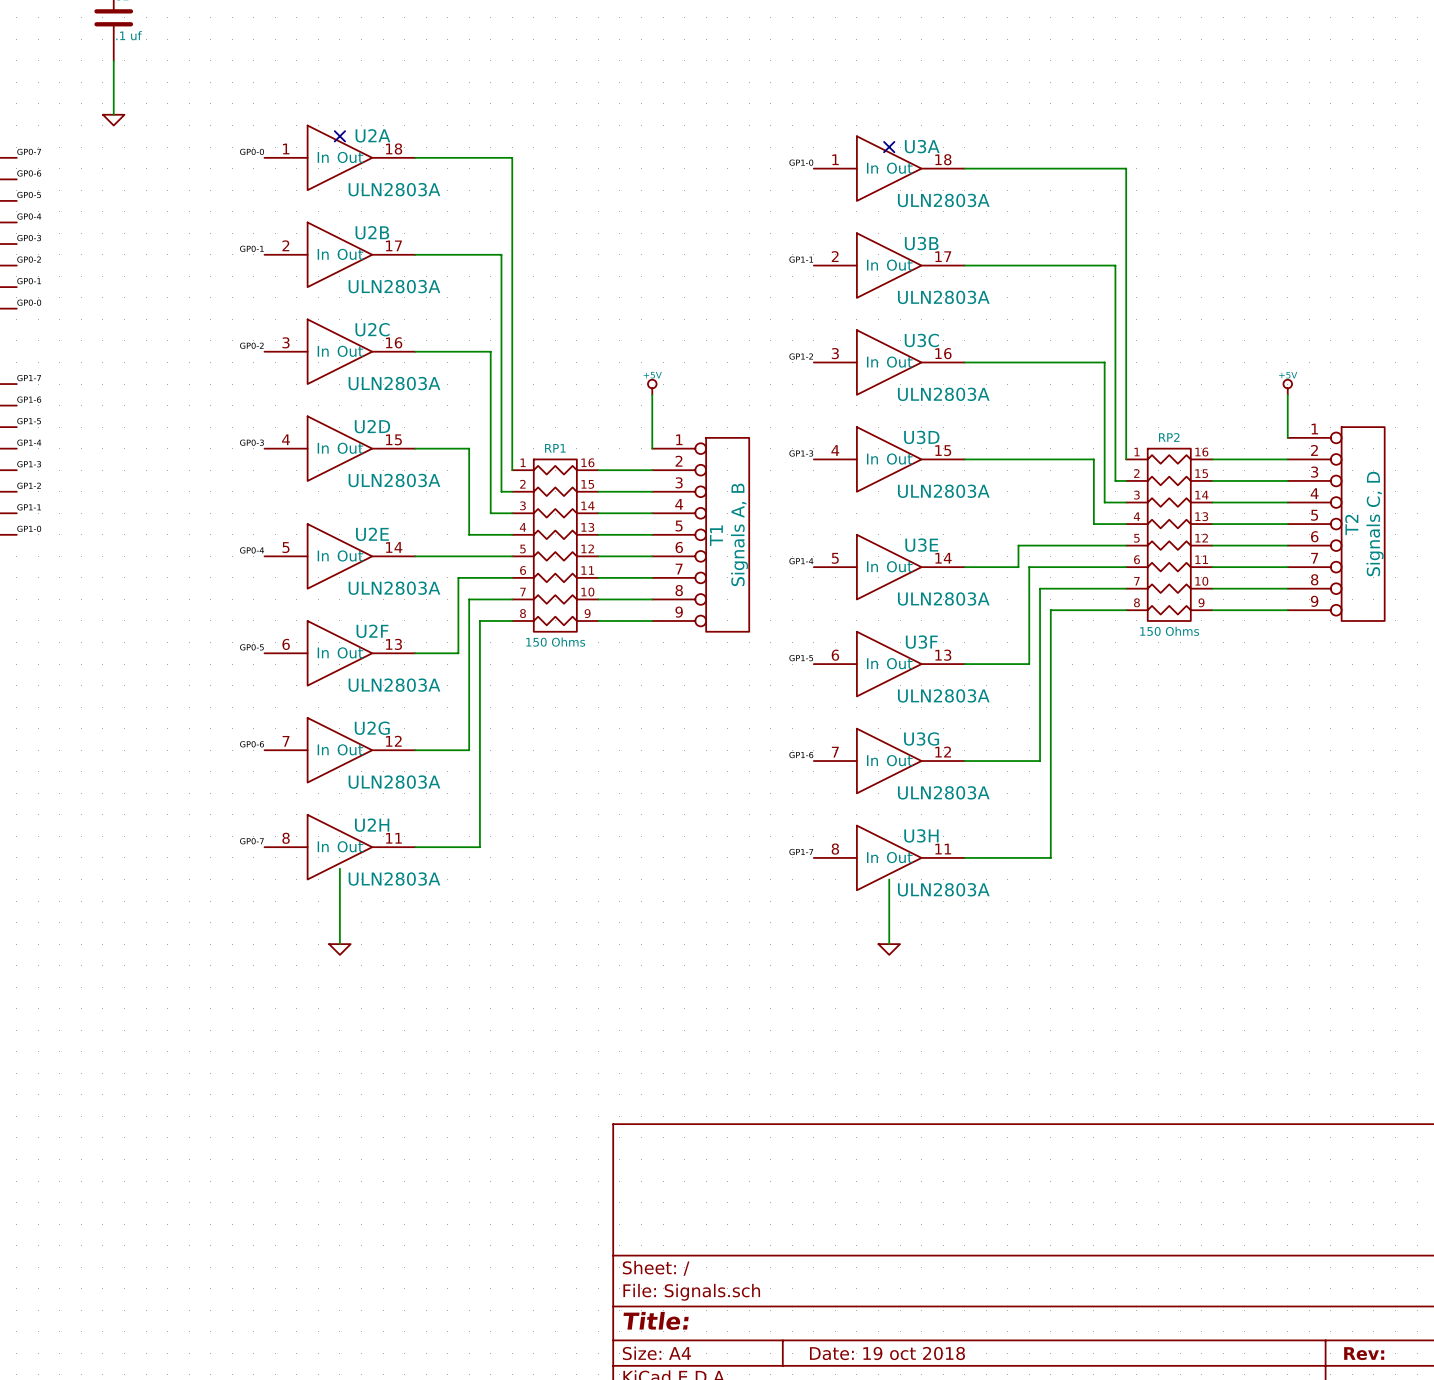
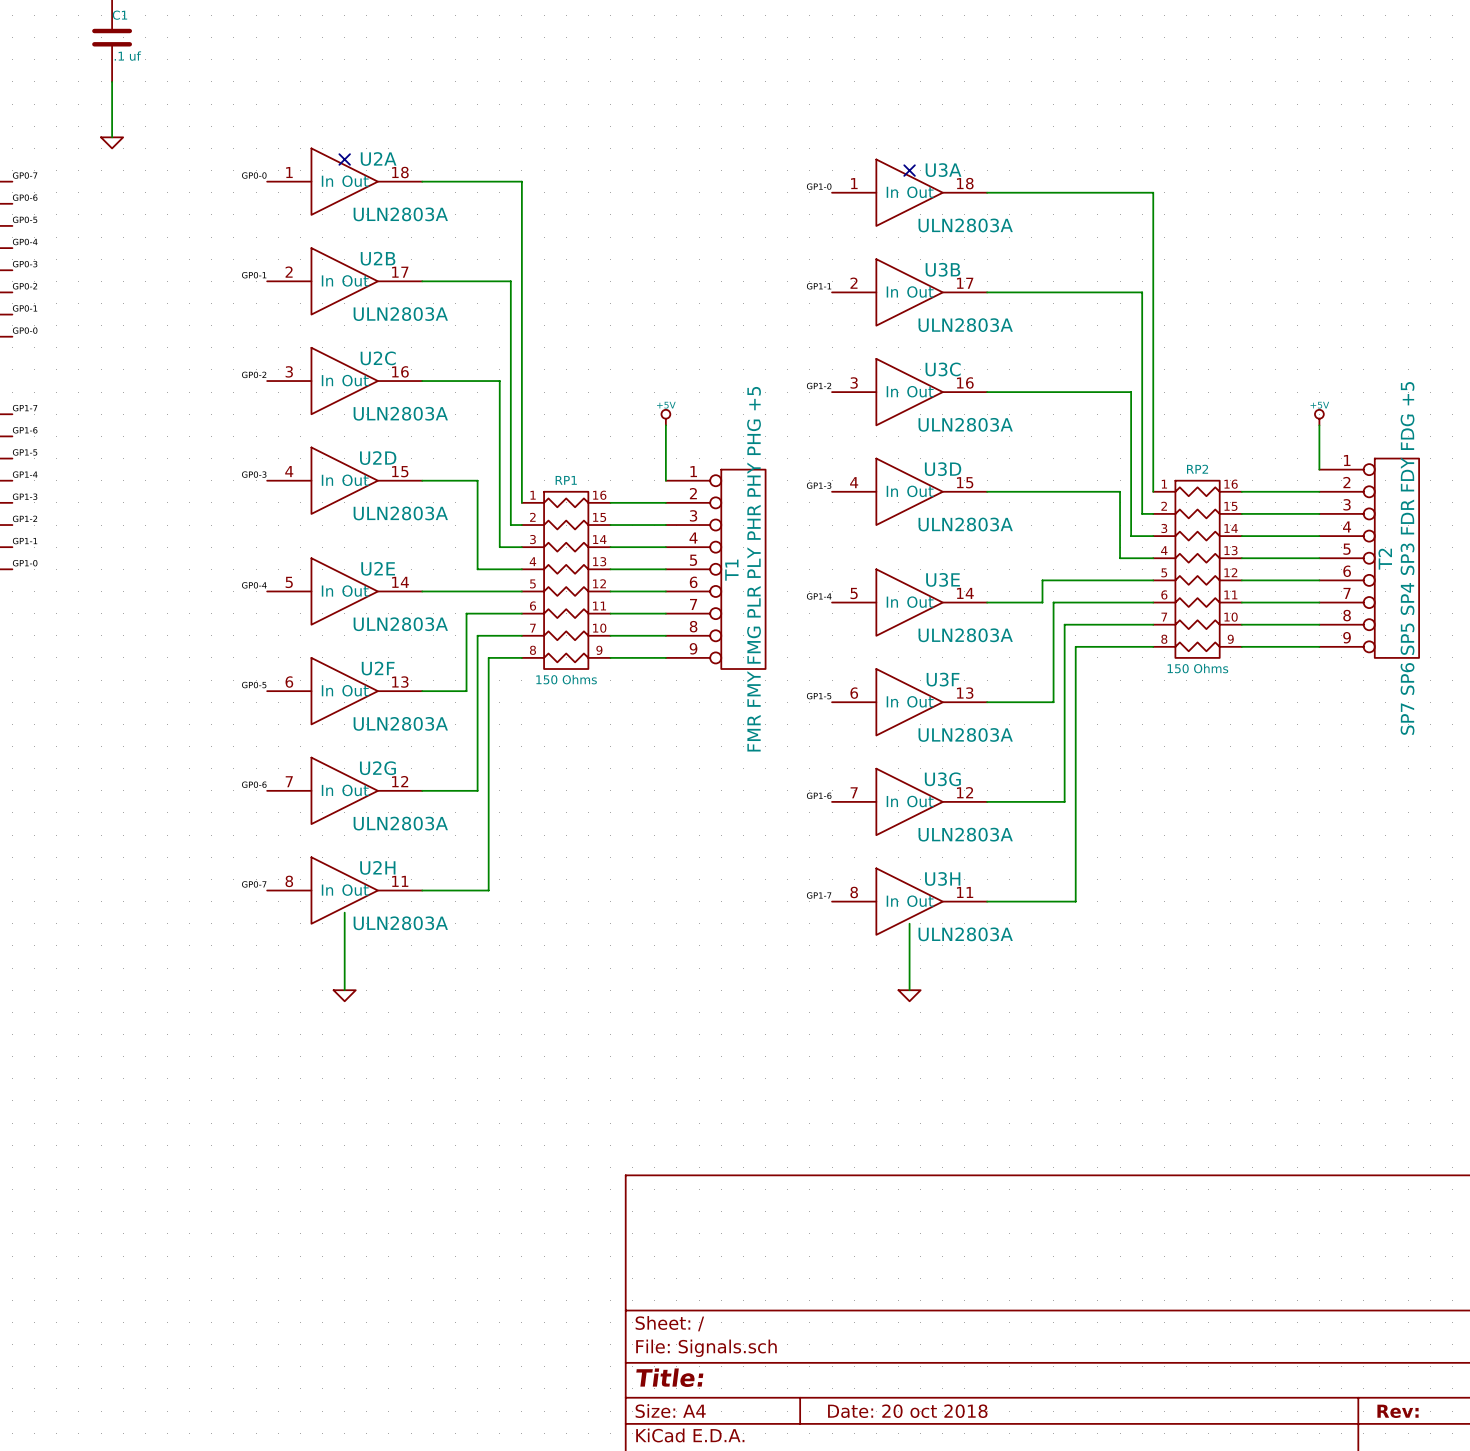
T2 value: Signals C, D (1375, 523) -> SP7 SP6 SP5 SP4 SP3 FDR FDY FDG +5 (1407, 558)
T1 value: Signals A, B (739, 534) -> FMR FMY FMG PLR PLY PHR PHY PHG +5 (754, 569)
title block: Date: 19 oct 2018 (887, 1353) -> Date: 20 oct 2018 (907, 1411)

